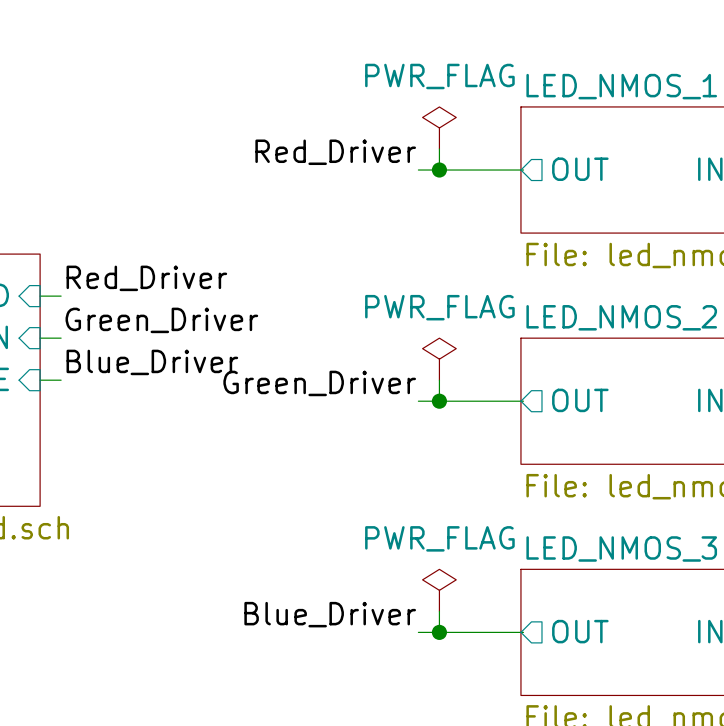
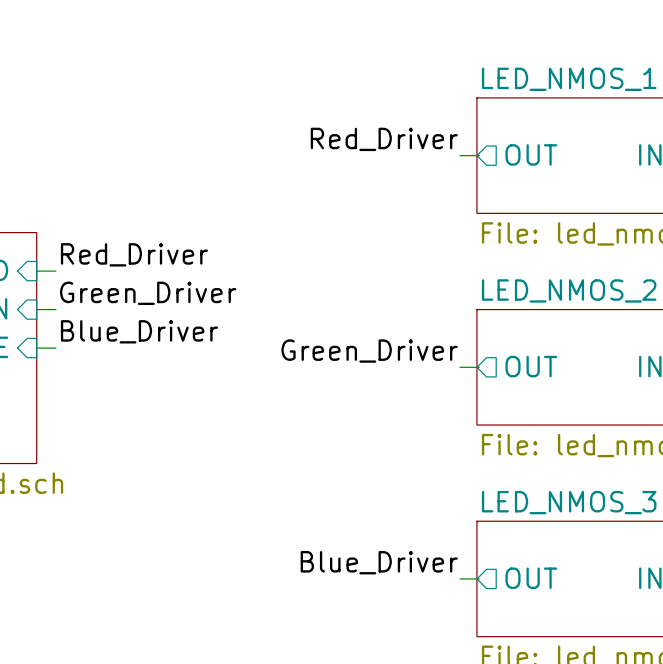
power symbol: PWR_FLAG (439, 127) -> none
wire: (439, 148) (439, 170) -> none
label position: Red_Driver (335, 152) -> Red_Driver (384, 139)
wire: (418, 170) (502, 170) -> none
junction: (439, 170) -> none
power symbol: PWR_FLAG (439, 359) -> none
wire: (439, 380) (439, 401) -> none
label position: Green_Driver (319, 383) -> Green_Driver (369, 351)
wire: (418, 401) (502, 401) -> none
junction: (439, 401) -> none
power symbol: PWR_FLAG (439, 590) -> none
wire: (439, 611) (439, 632) -> none
label position: Blue_Driver (330, 614) -> Blue_Driver (379, 562)
wire: (418, 632) (502, 632) -> none
junction: (439, 632) -> none

